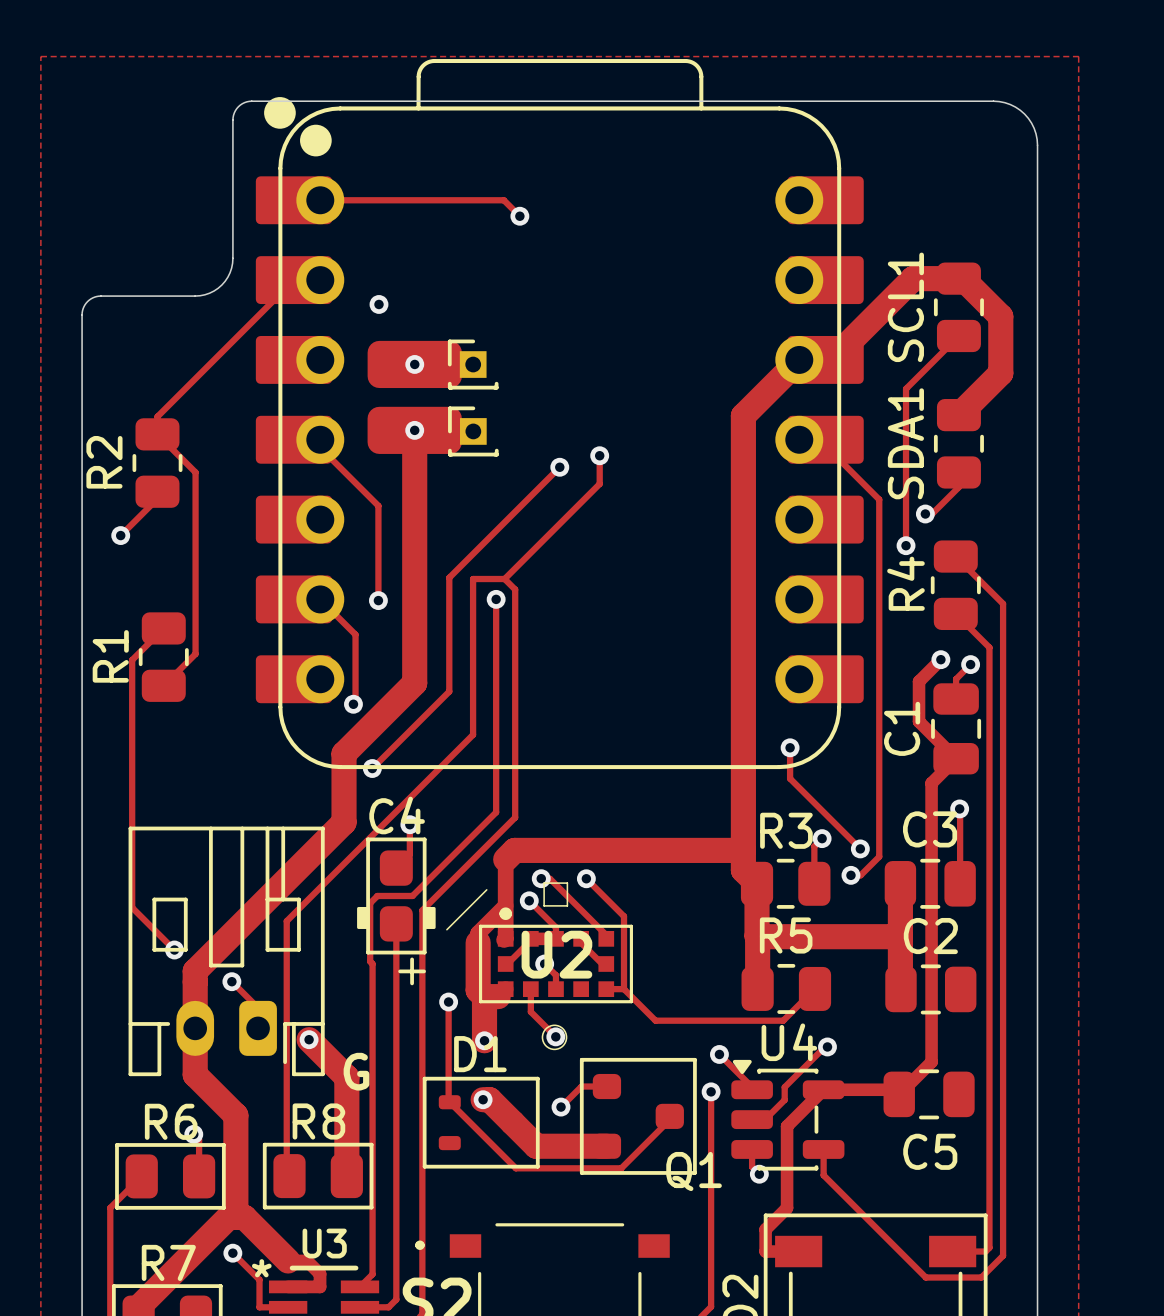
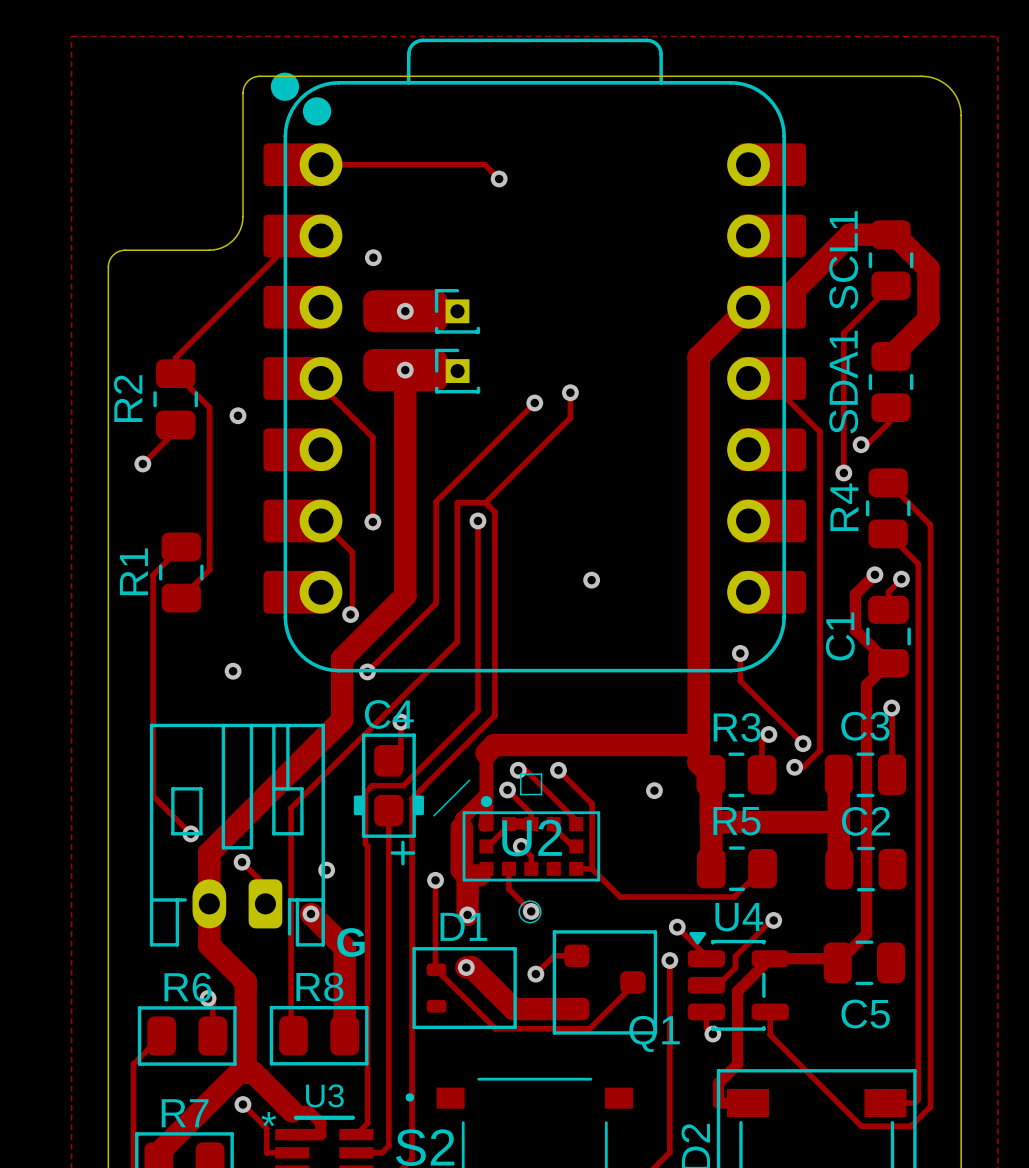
via: none -> (238, 415)
via: none -> (591, 580)
via: none -> (233, 671)
via: none -> (654, 790)
via: none -> (326, 870)

